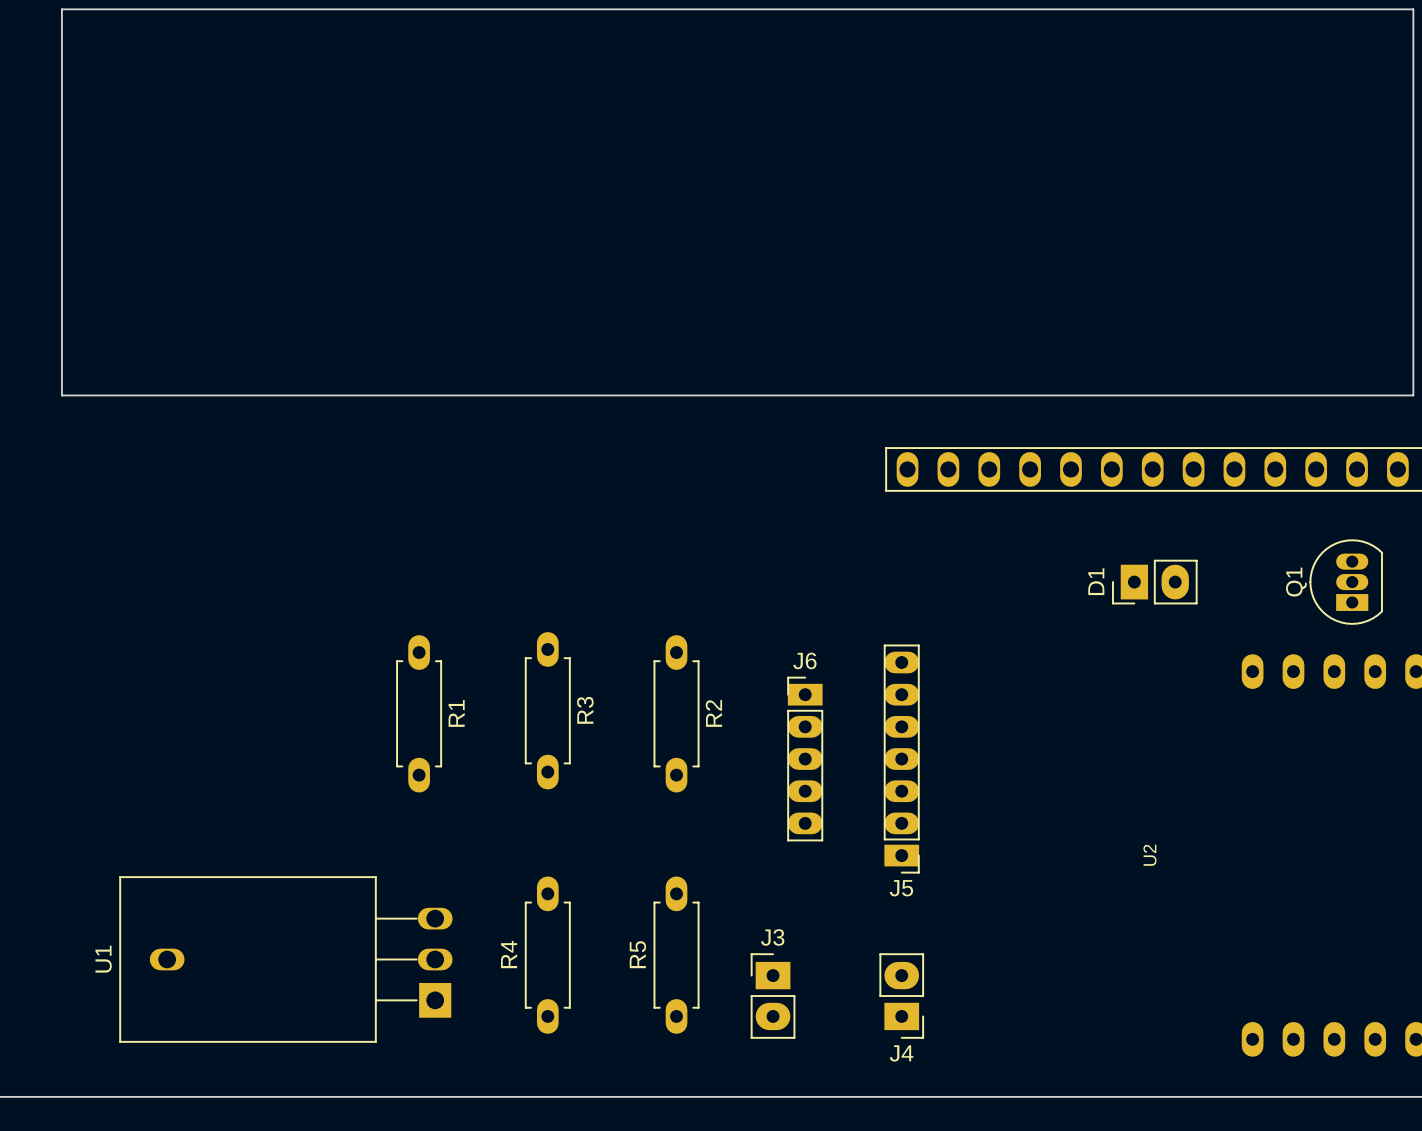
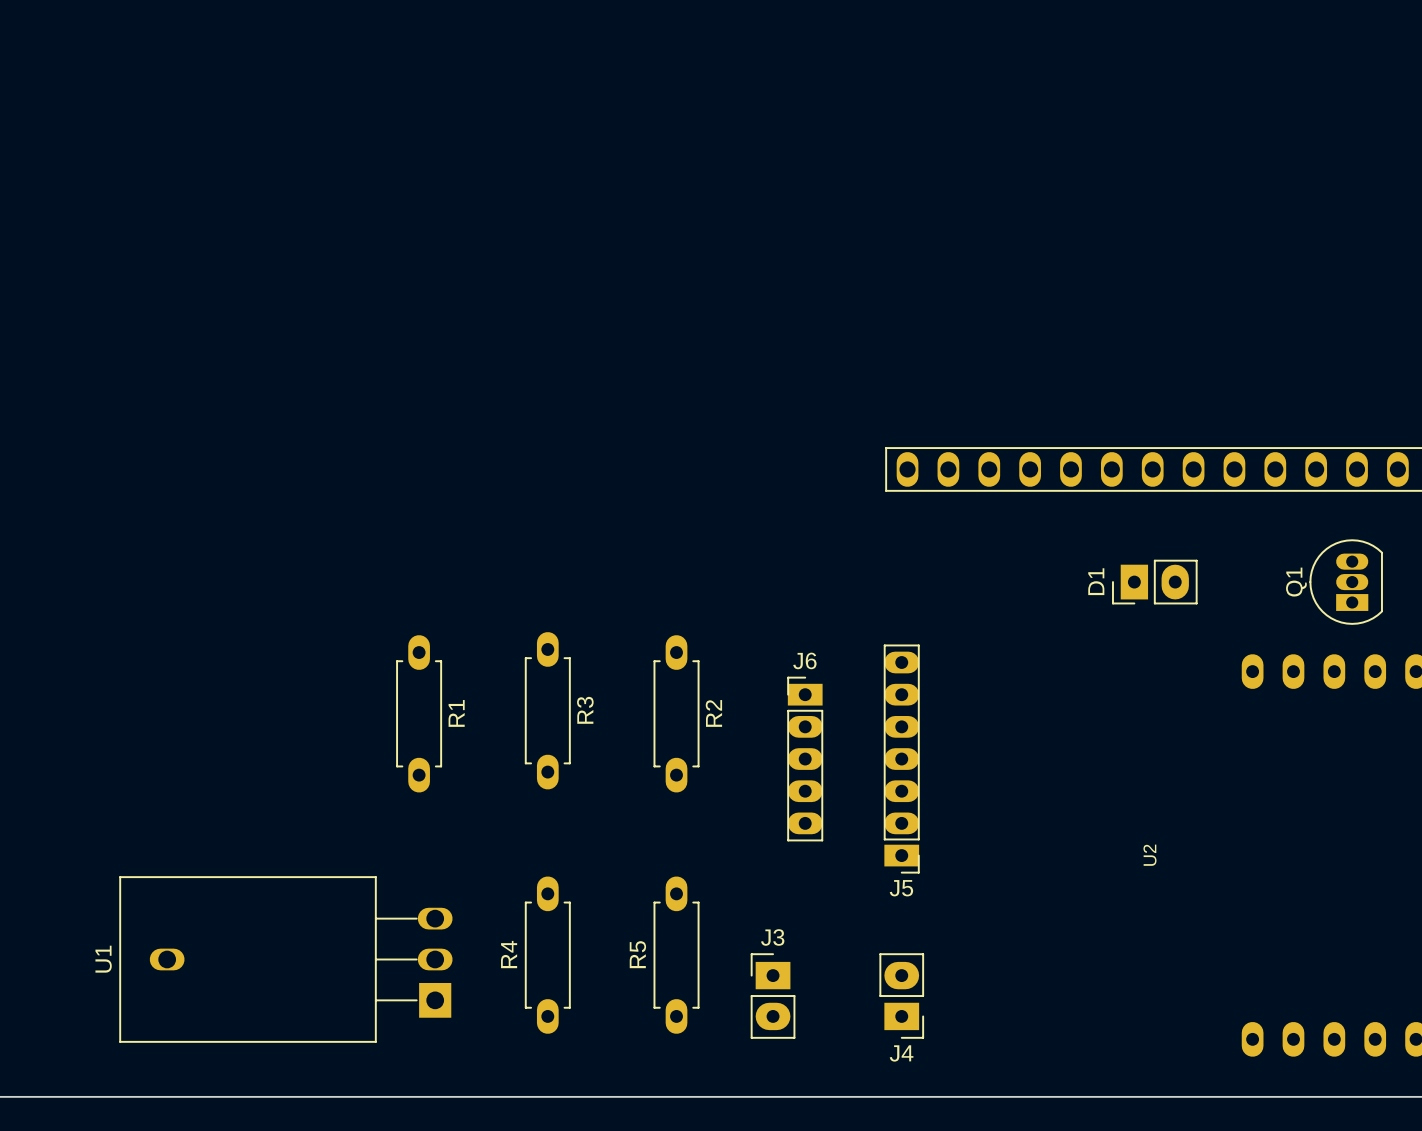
board edge: (61, 9) (1413, 9) (1413, 395) (61, 395) (61, 9) -> none

